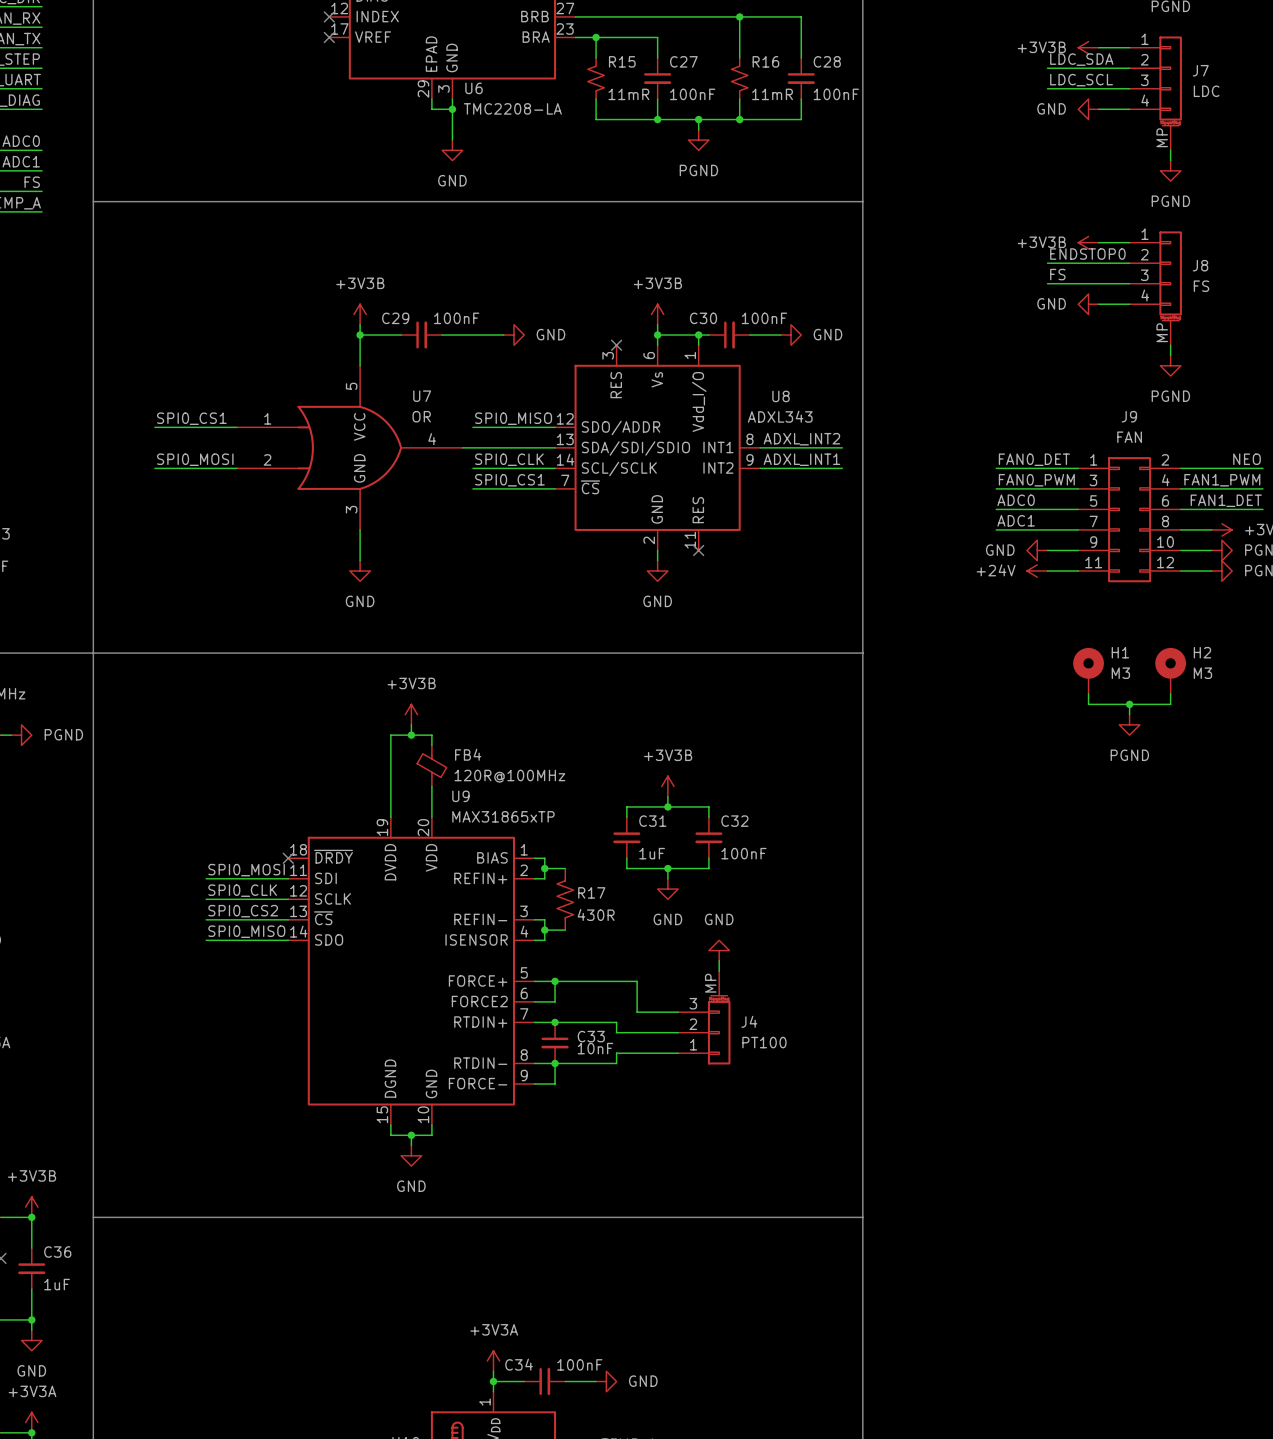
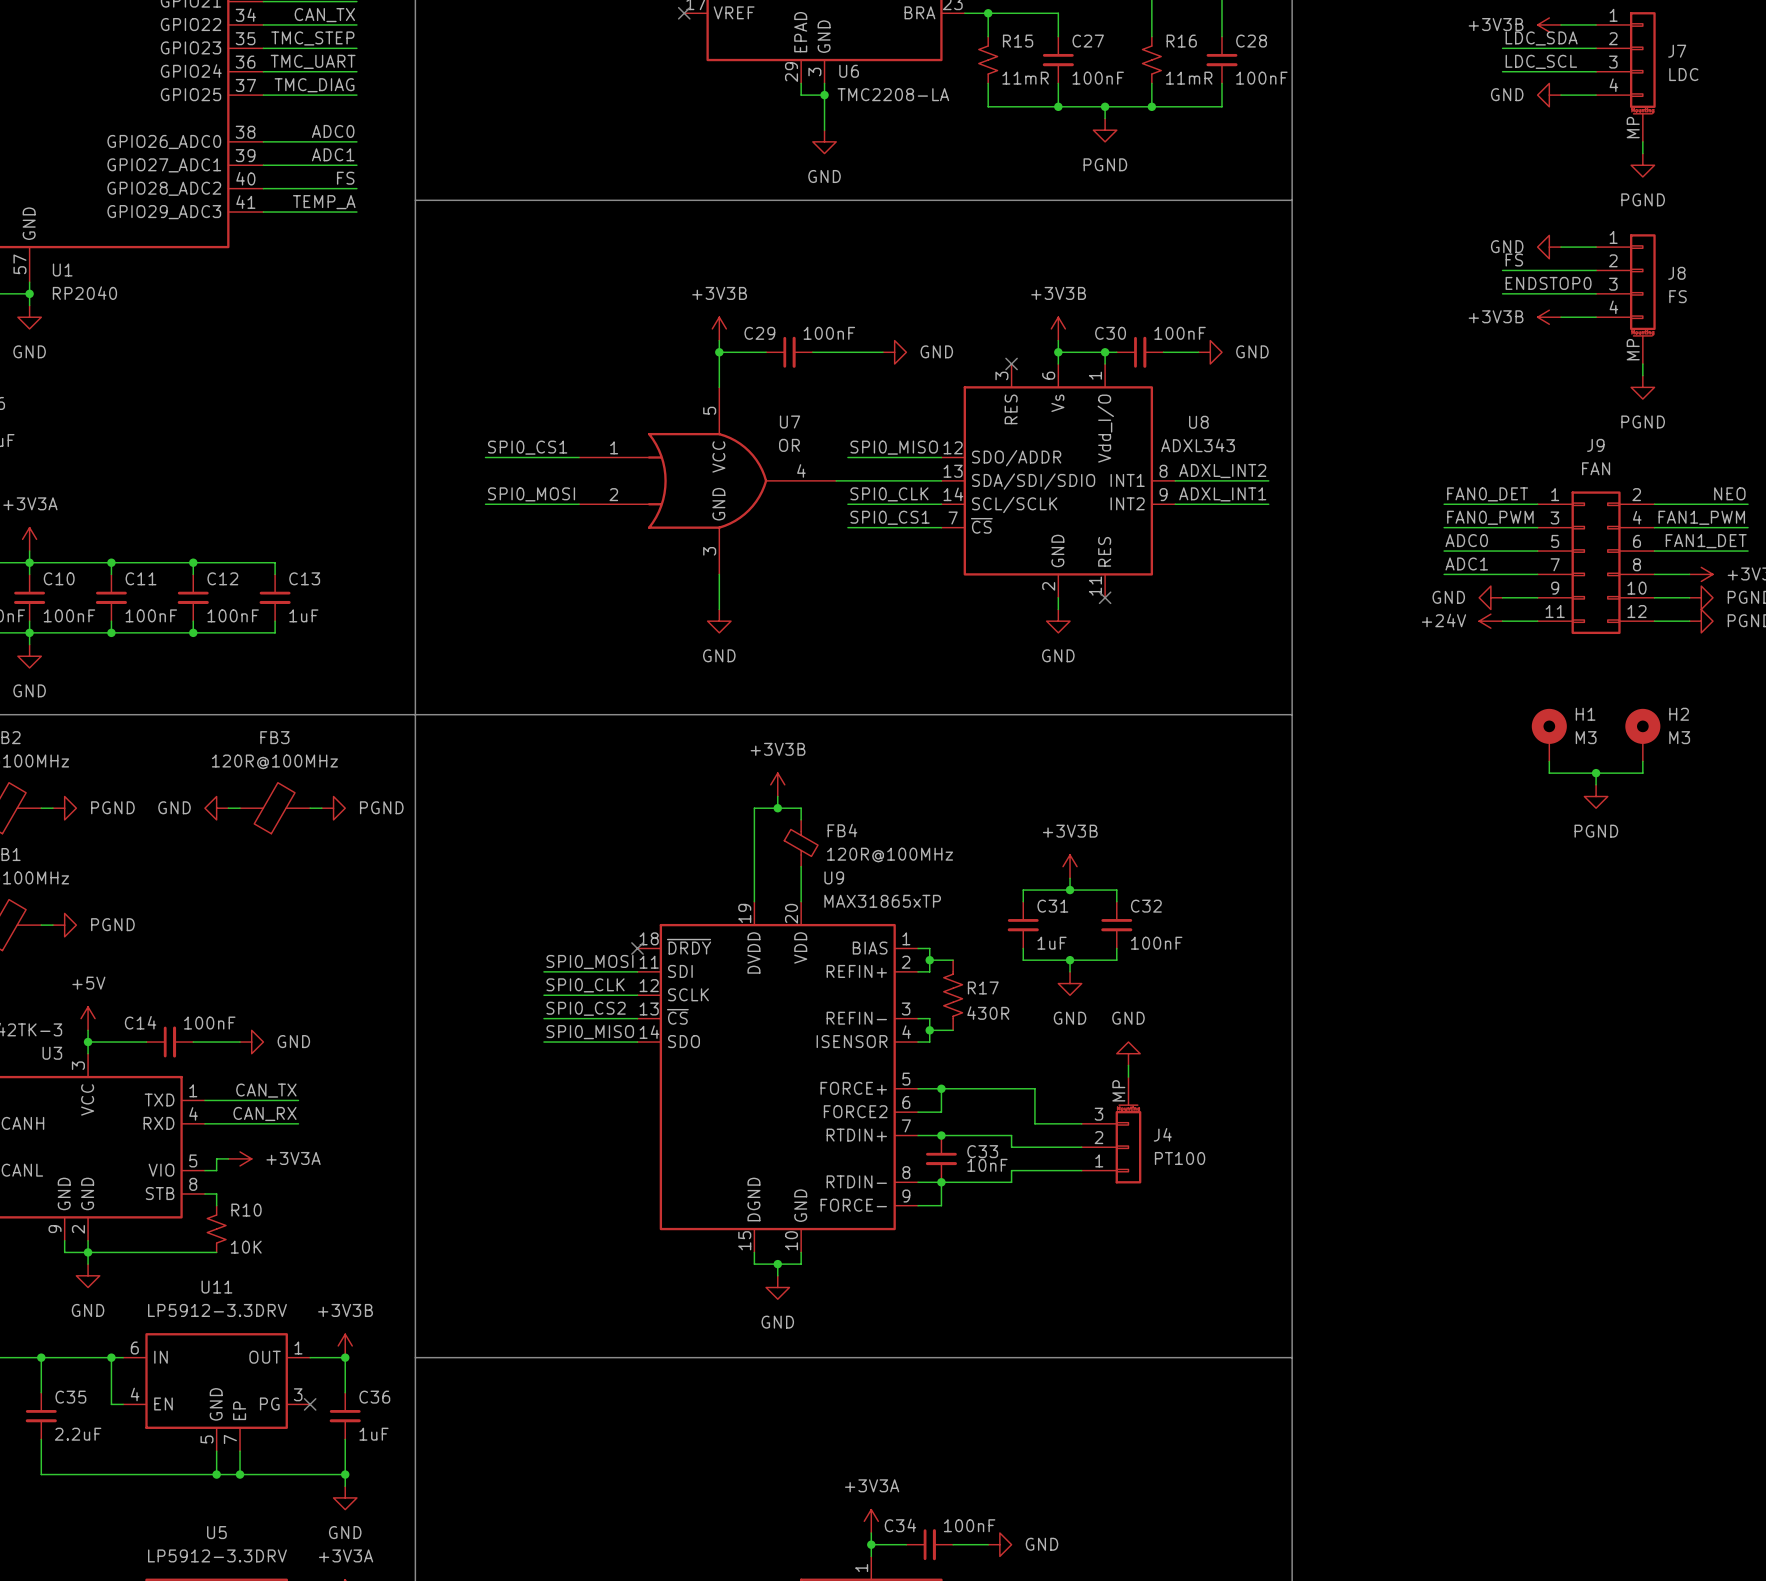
power symbol: +3V3B (1088, 242) -> GND (1549, 247)
label: ENDSTOP0 (1087, 254) -> FS (1514, 260)
label: FS (1057, 274) -> ENDSTOP0 (1548, 283)
power symbol: GND (1088, 304) -> +3V3B (1549, 317)

